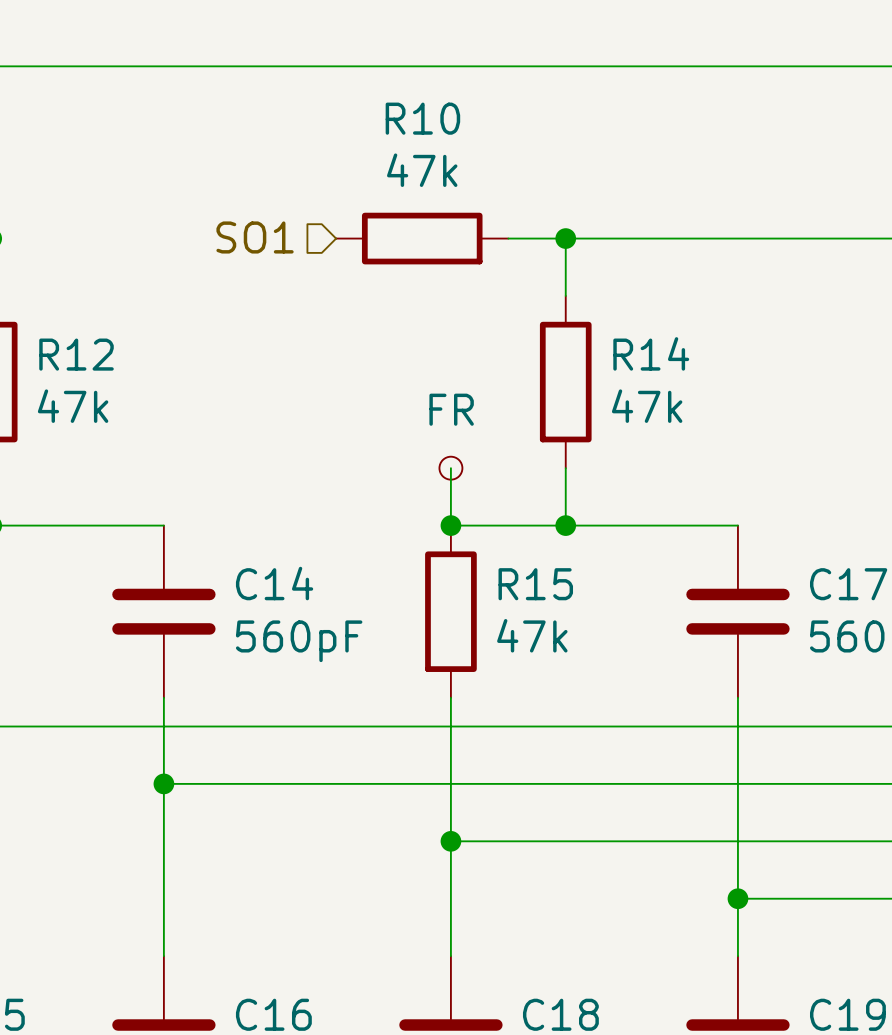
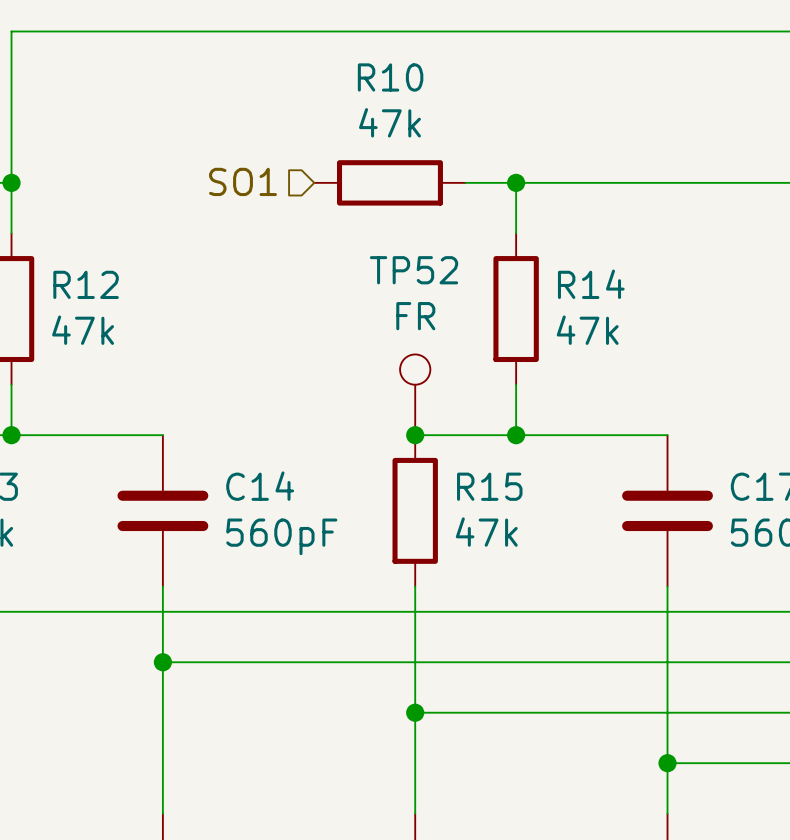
part: FR (450, 468) -> none
TP52: none -> FR (415, 394)

